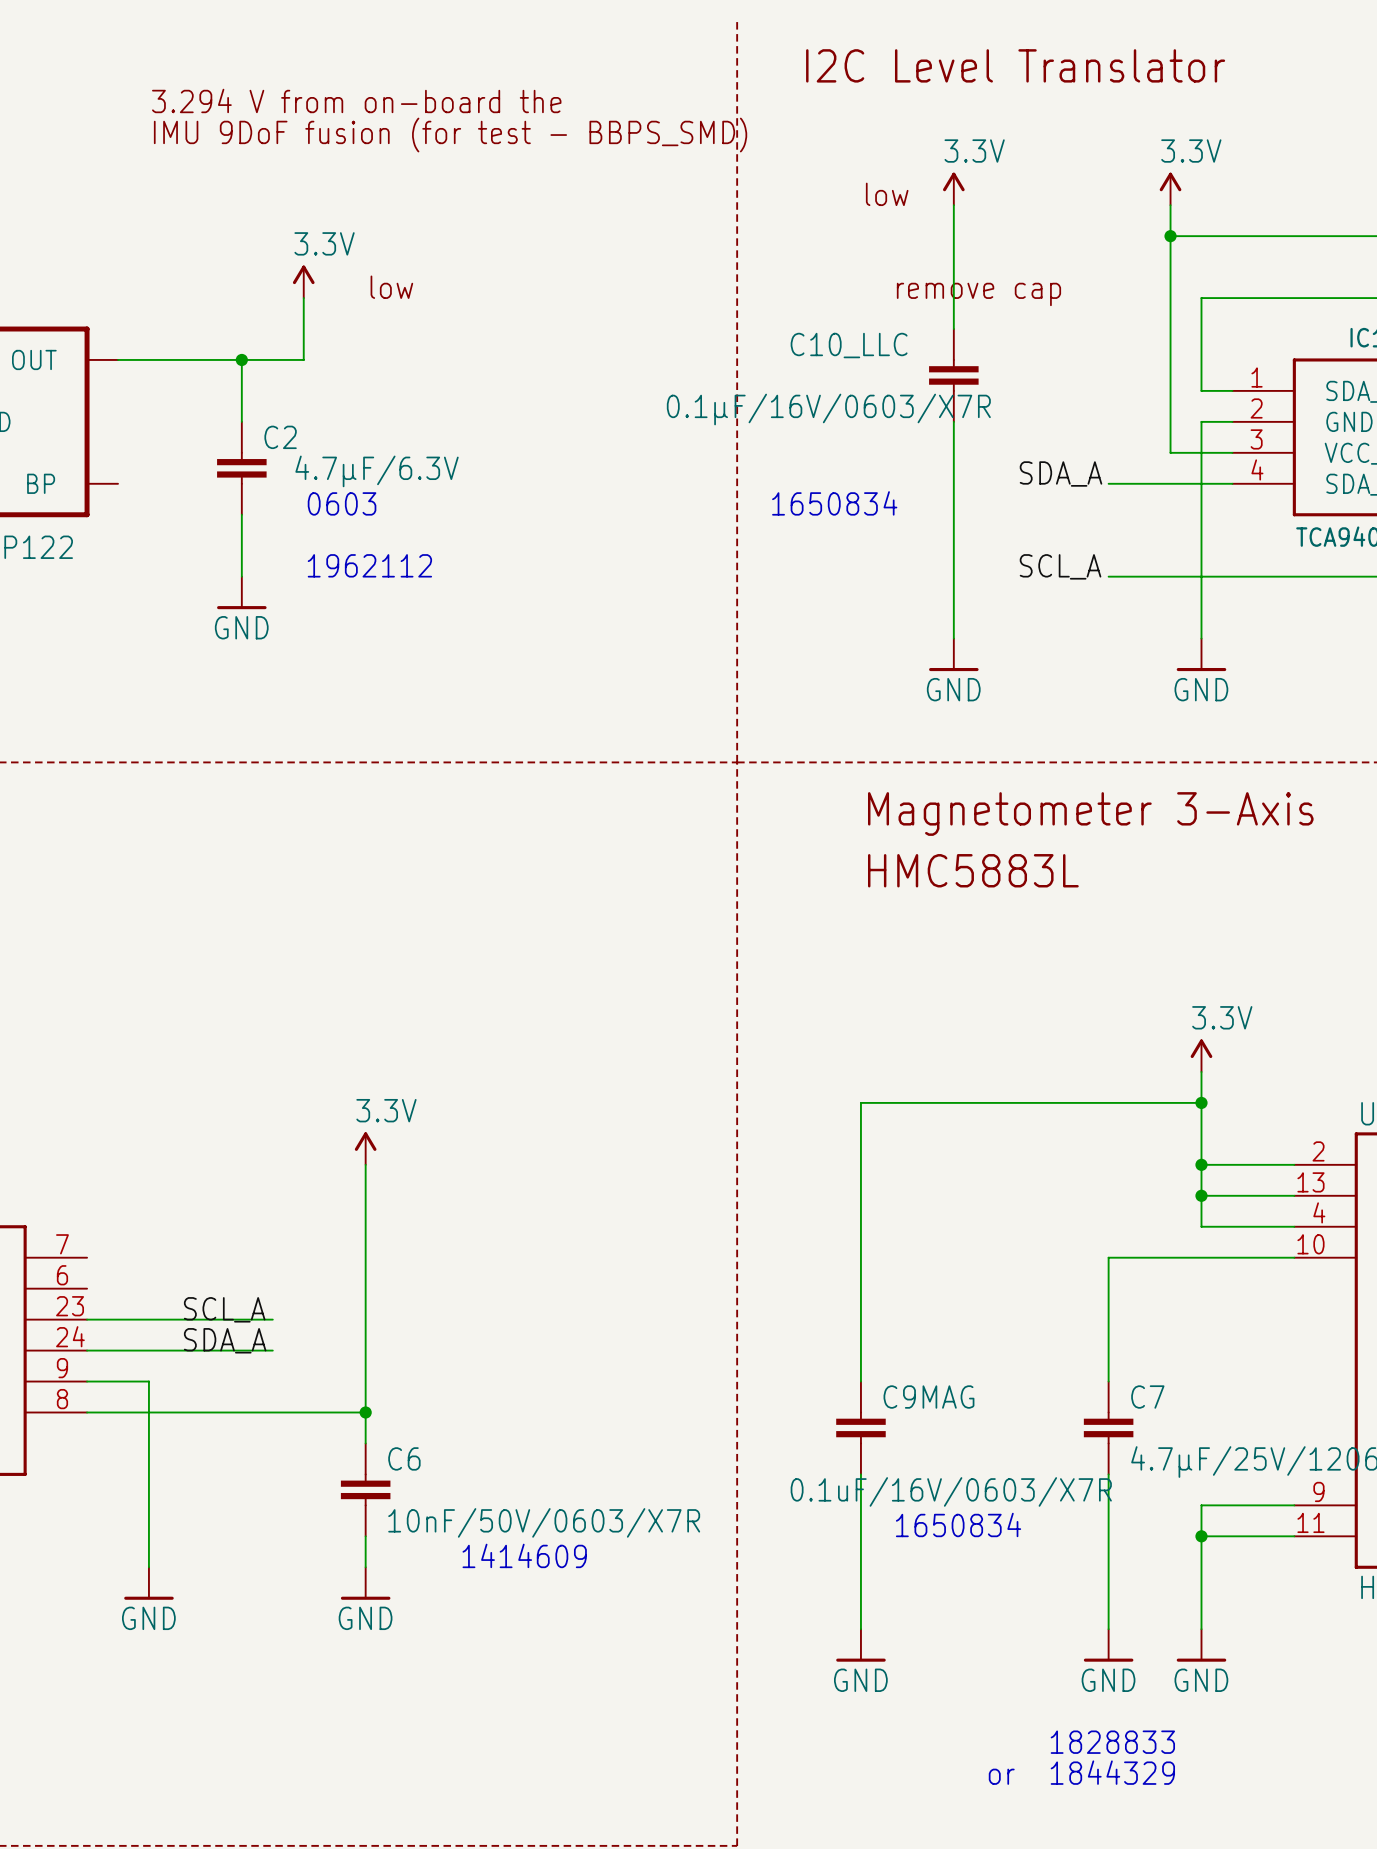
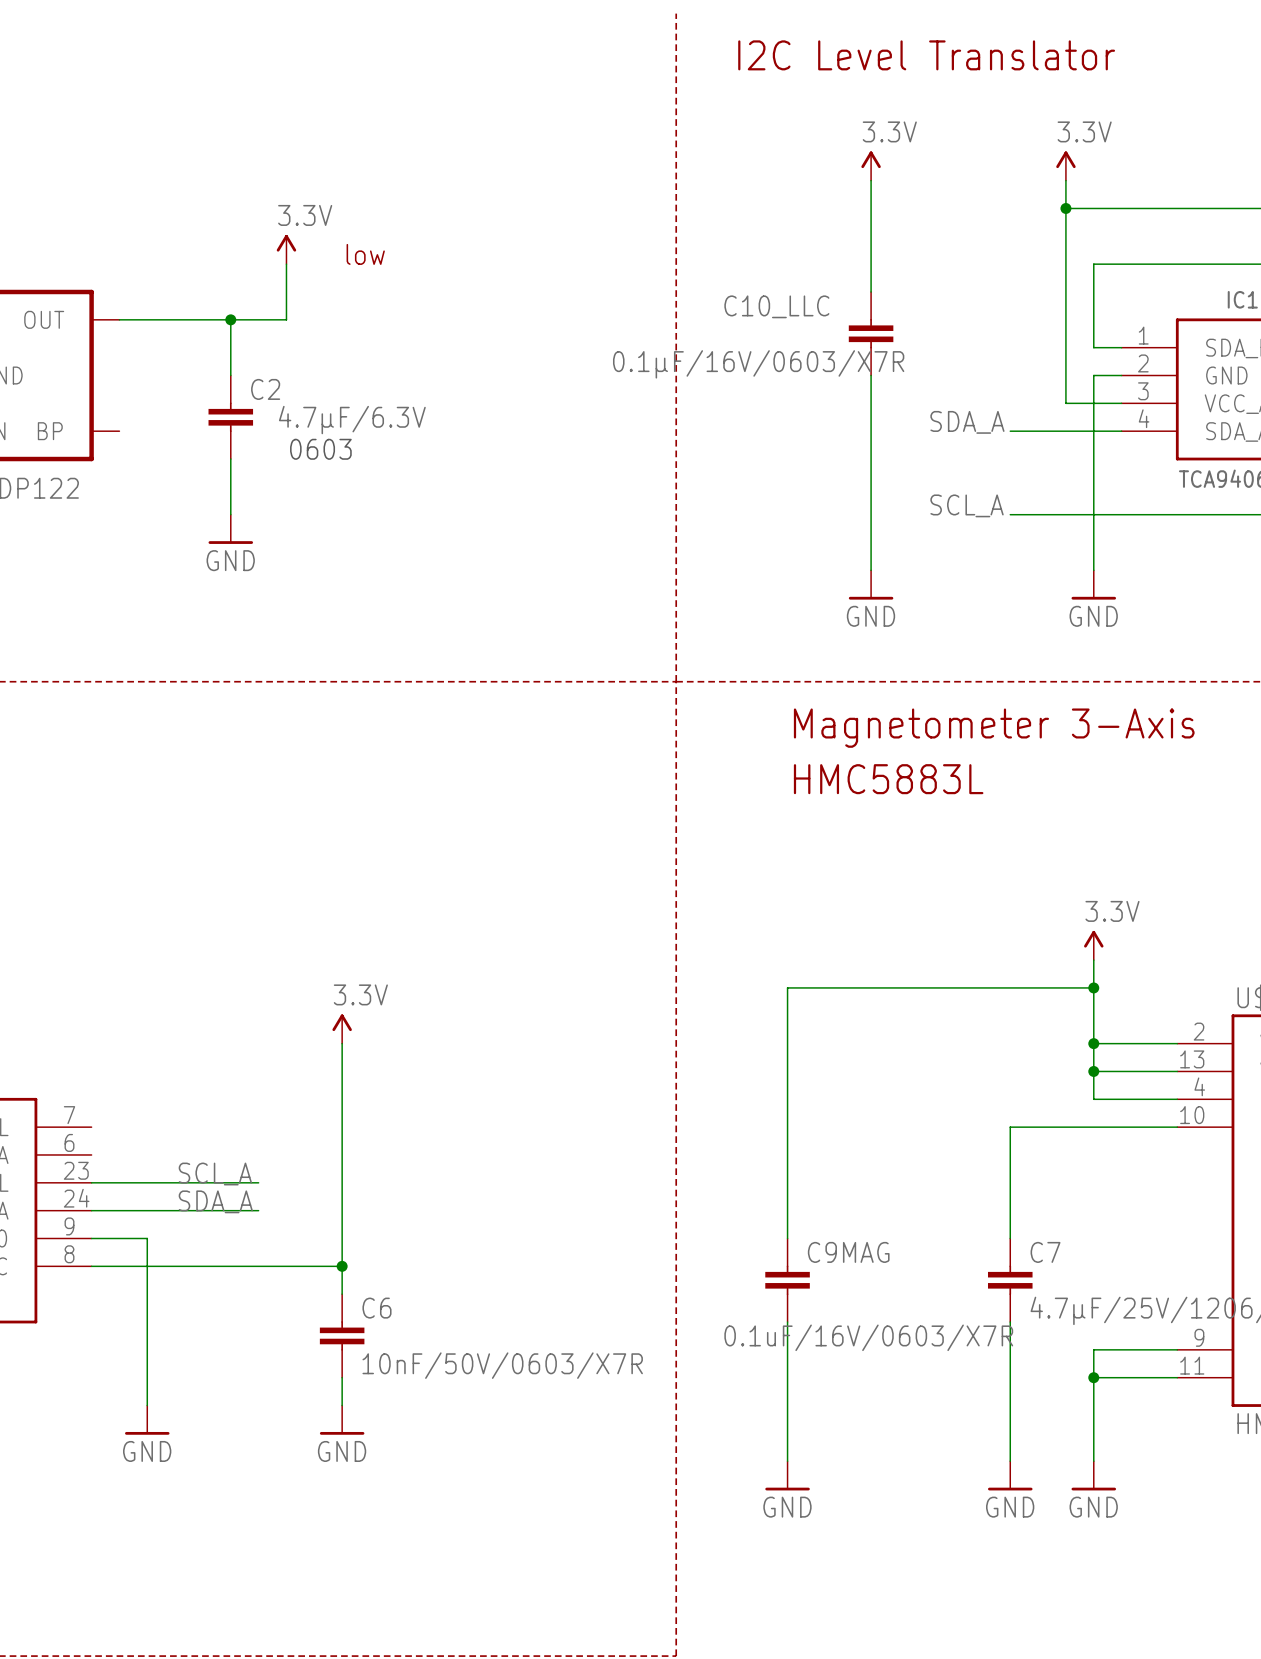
text: 3.294 V from on-board the (356, 100) -> none
text: IMU 9DoF fusion (for test - BBPS_SMD) (450, 135) -> none
text: low (887, 194) -> none
text: remove cap (978, 294) -> none
text: 1650834 (834, 503) -> none
text: 1962112 (369, 565) -> none
text: 1650834 (958, 1524) -> none
text: 1414609 (524, 1555) -> none
text: 1828833 (1112, 1742) -> none
text: 1844329 (1112, 1772) -> none
text: or (1001, 1776) -> none

